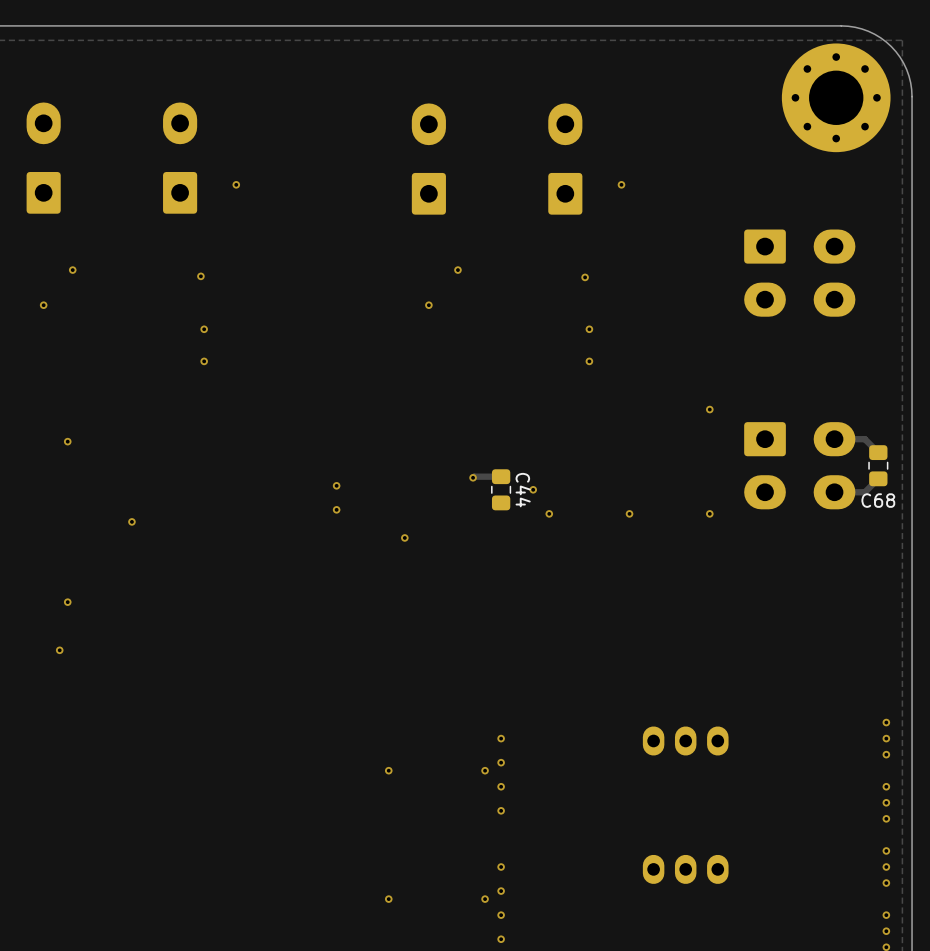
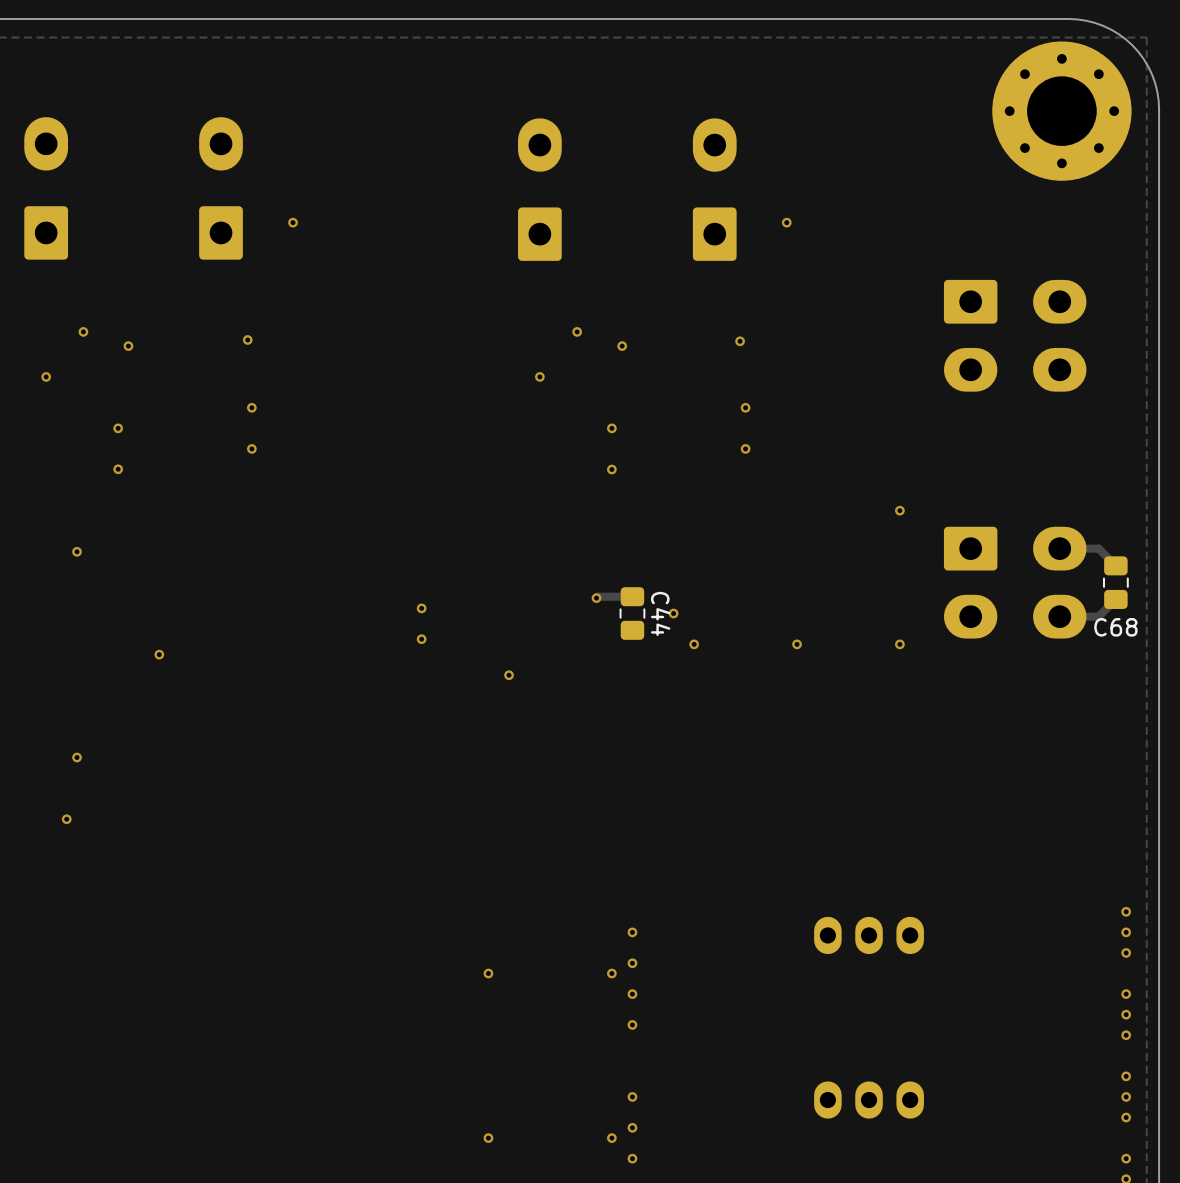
via: none -> (128, 346)
via: none -> (622, 346)
via: none -> (118, 428)
via: none -> (611, 428)
via: none -> (118, 469)
via: none -> (611, 469)

